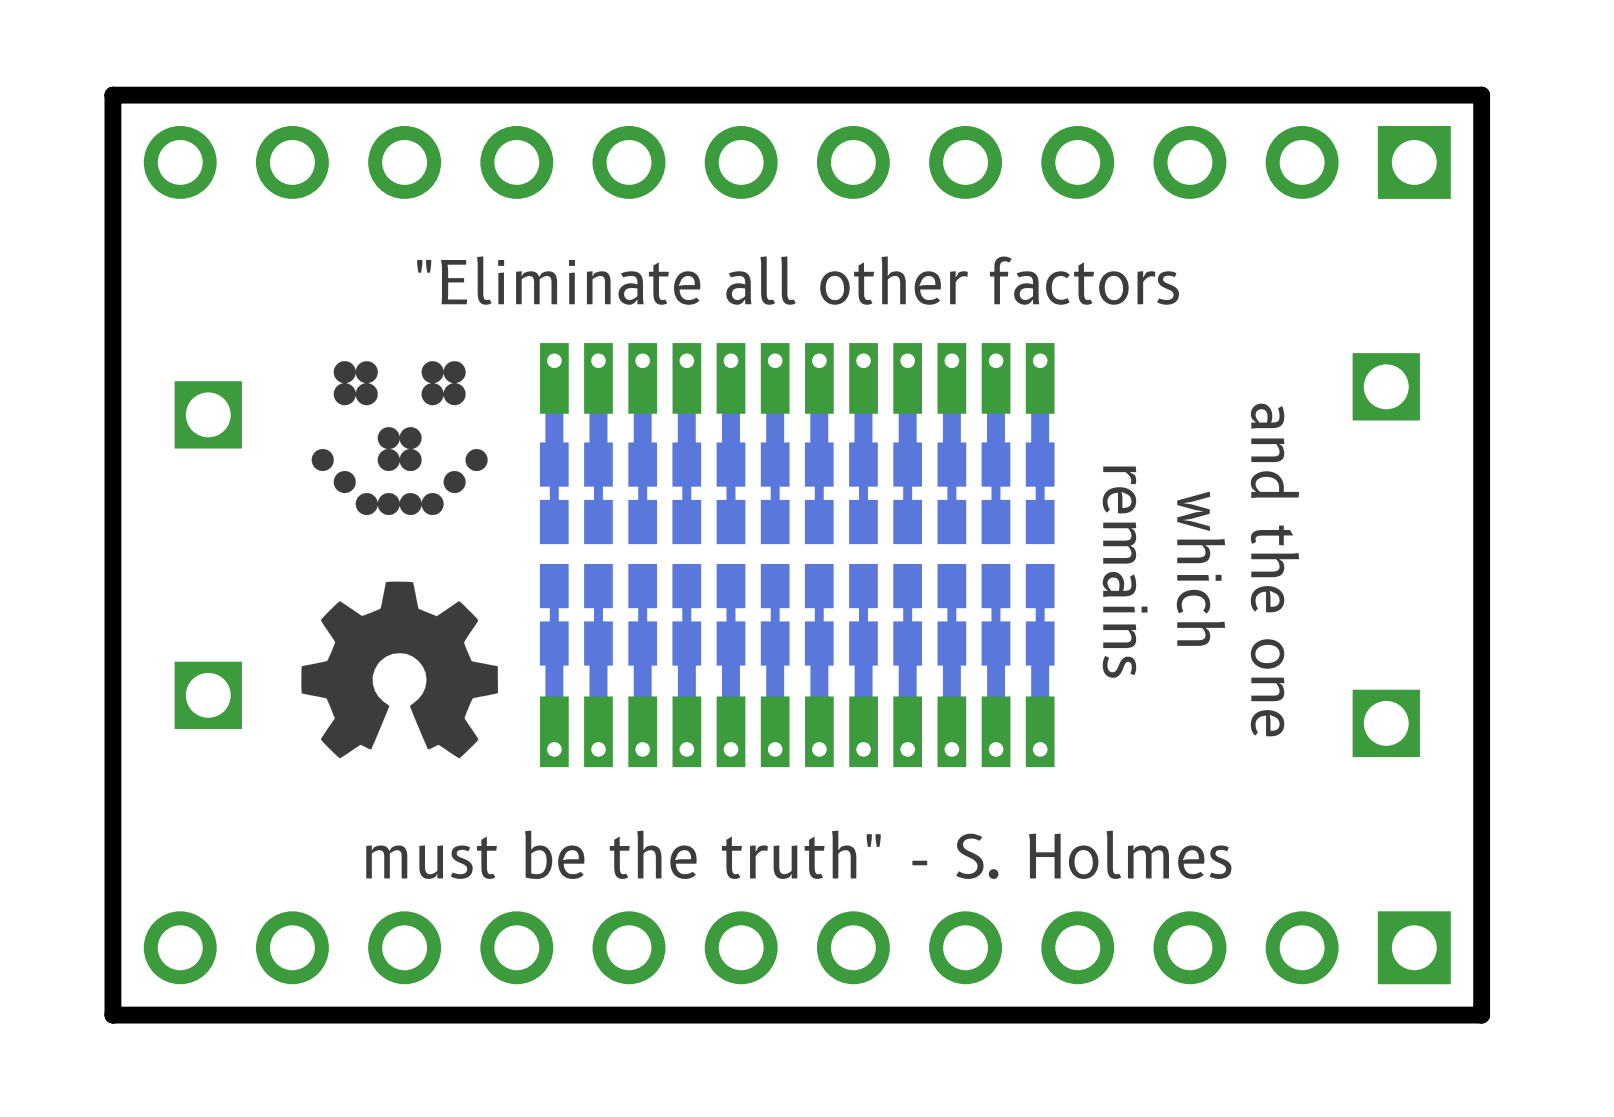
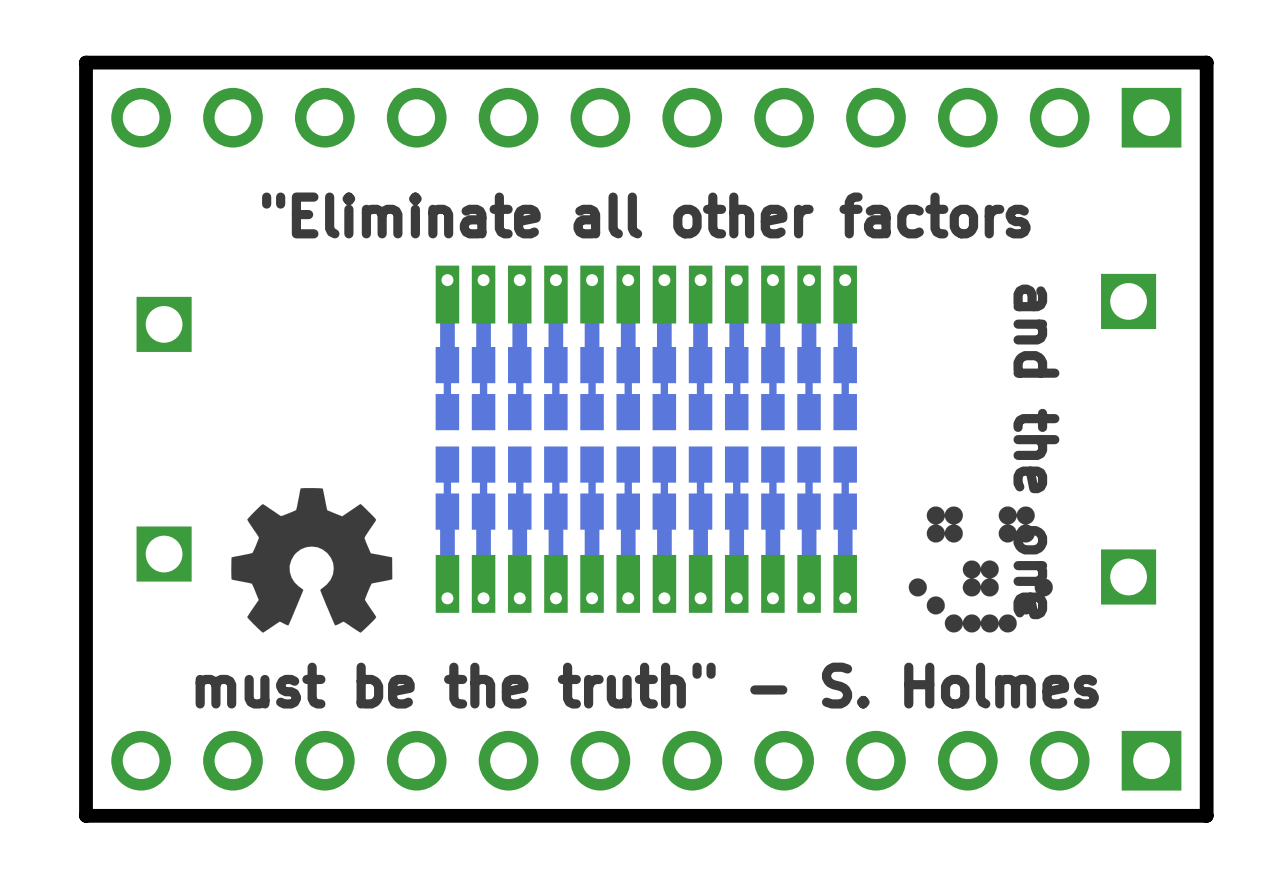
drawing position: (399, 438) -> (980, 569)
text: which (1200, 568) -> none
text: remains (1125, 572) -> none
drawing position: (399, 669) -> (311, 560)

